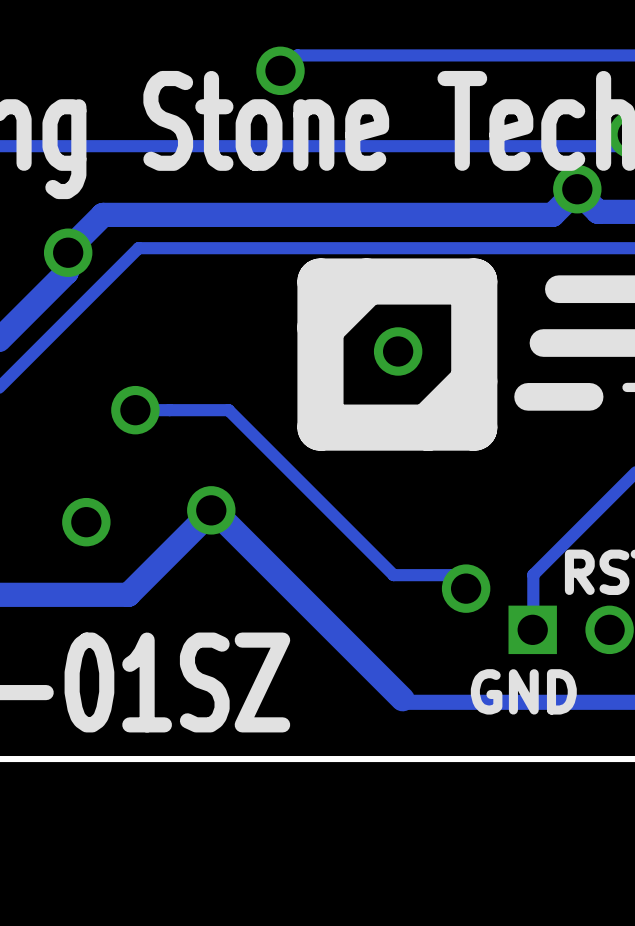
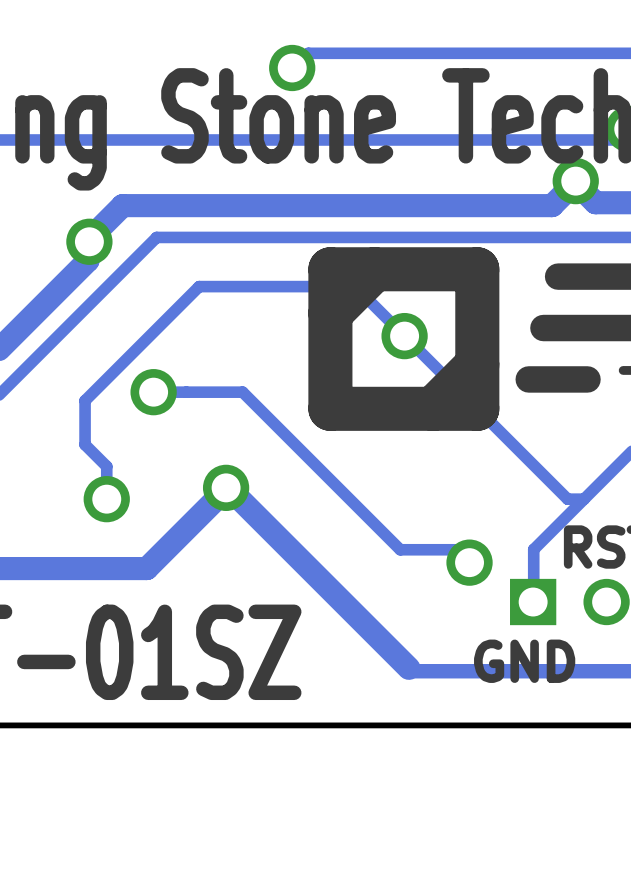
track: none -> (584, 499) (567, 499) (355, 286) (199, 286) (85, 400) (85, 444) (106, 466) (106, 499)

